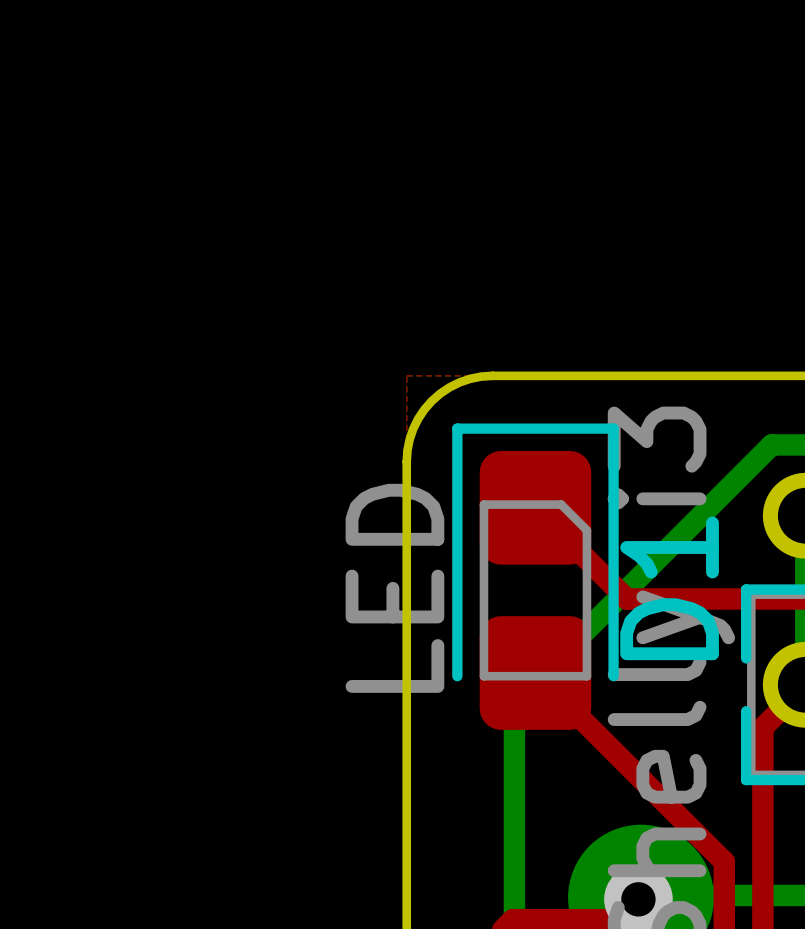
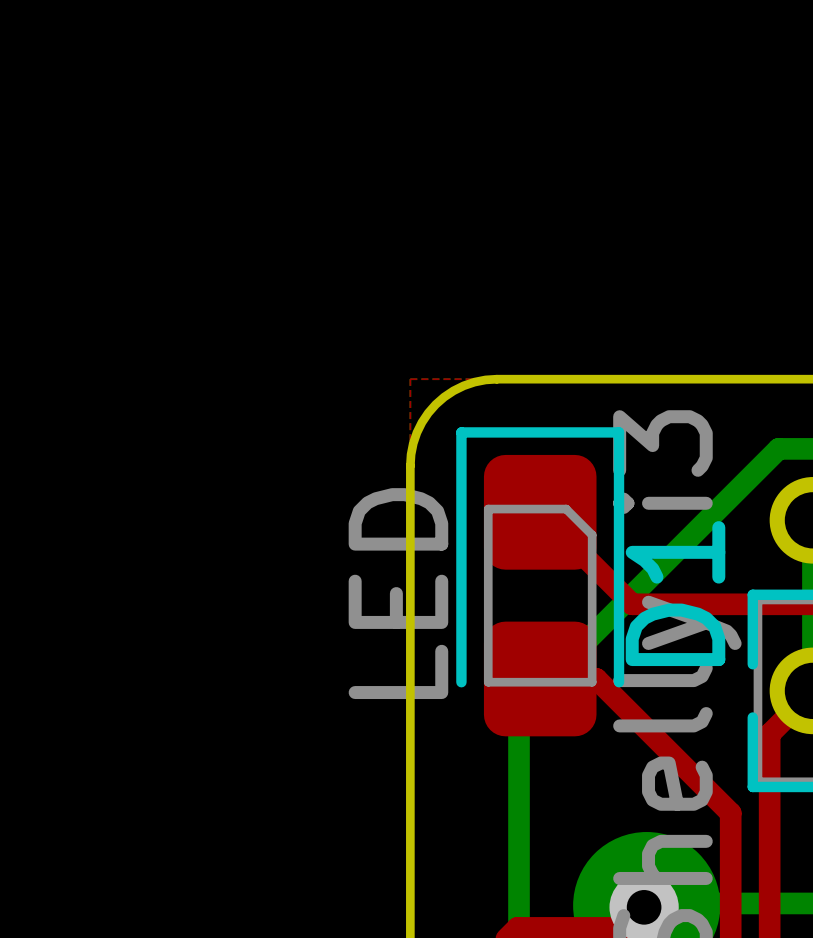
top track: (535, 672) (724, 861) -> (540, 678) (596, 678) (730, 813) (730, 869)

